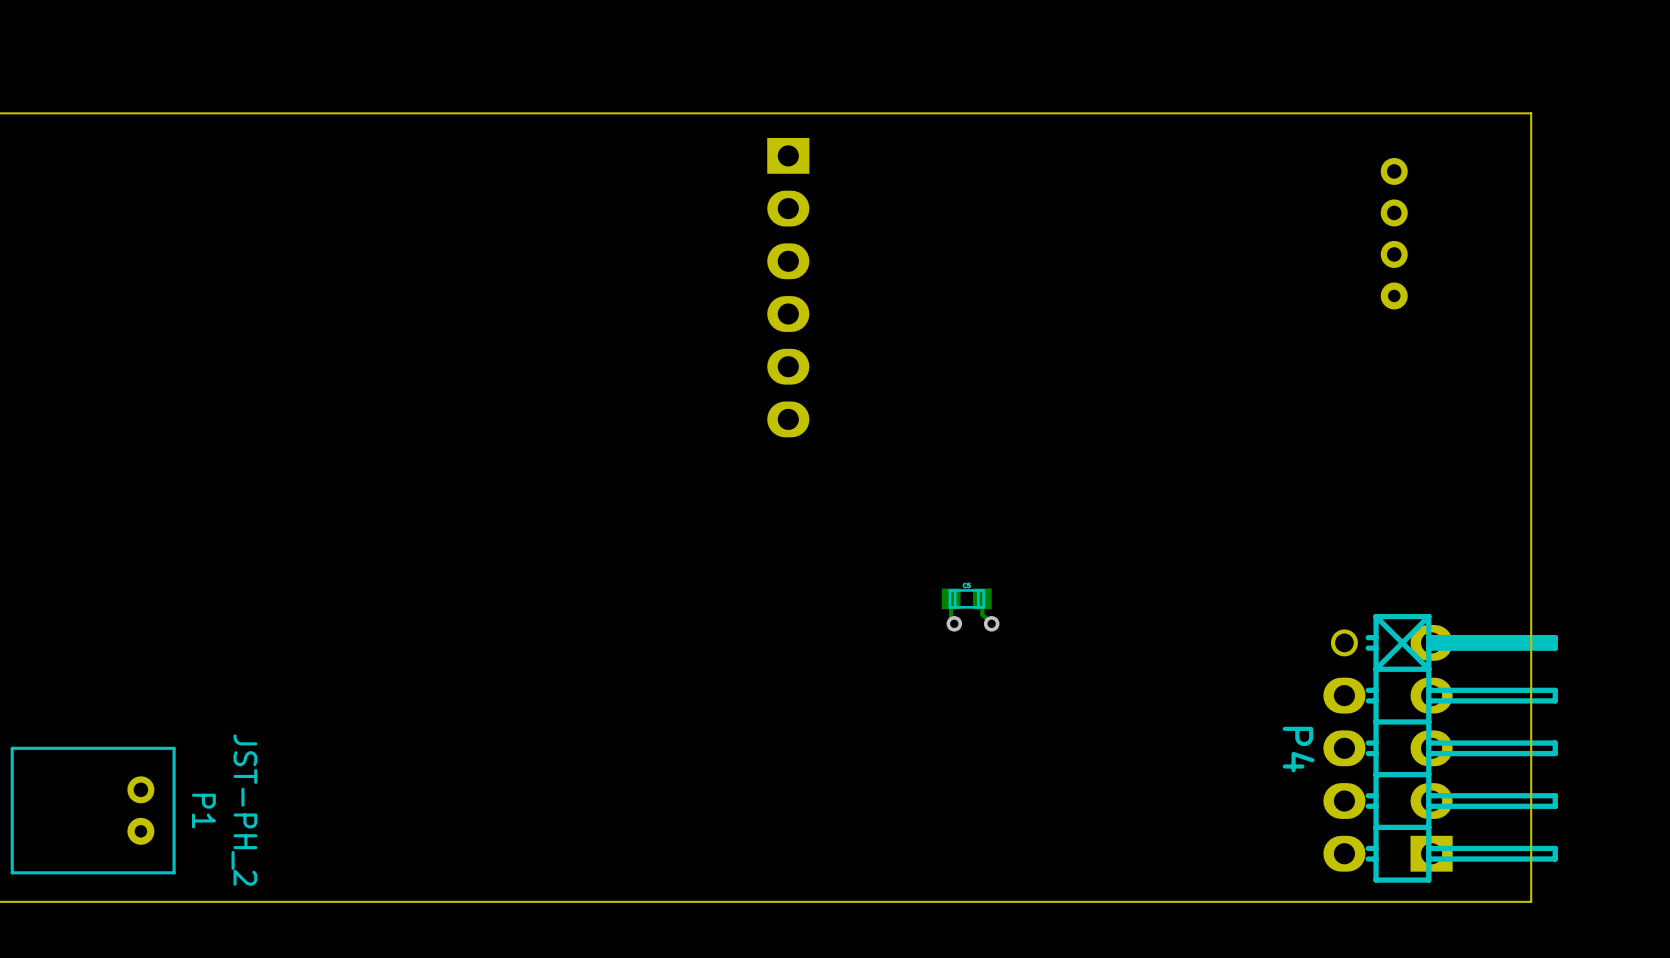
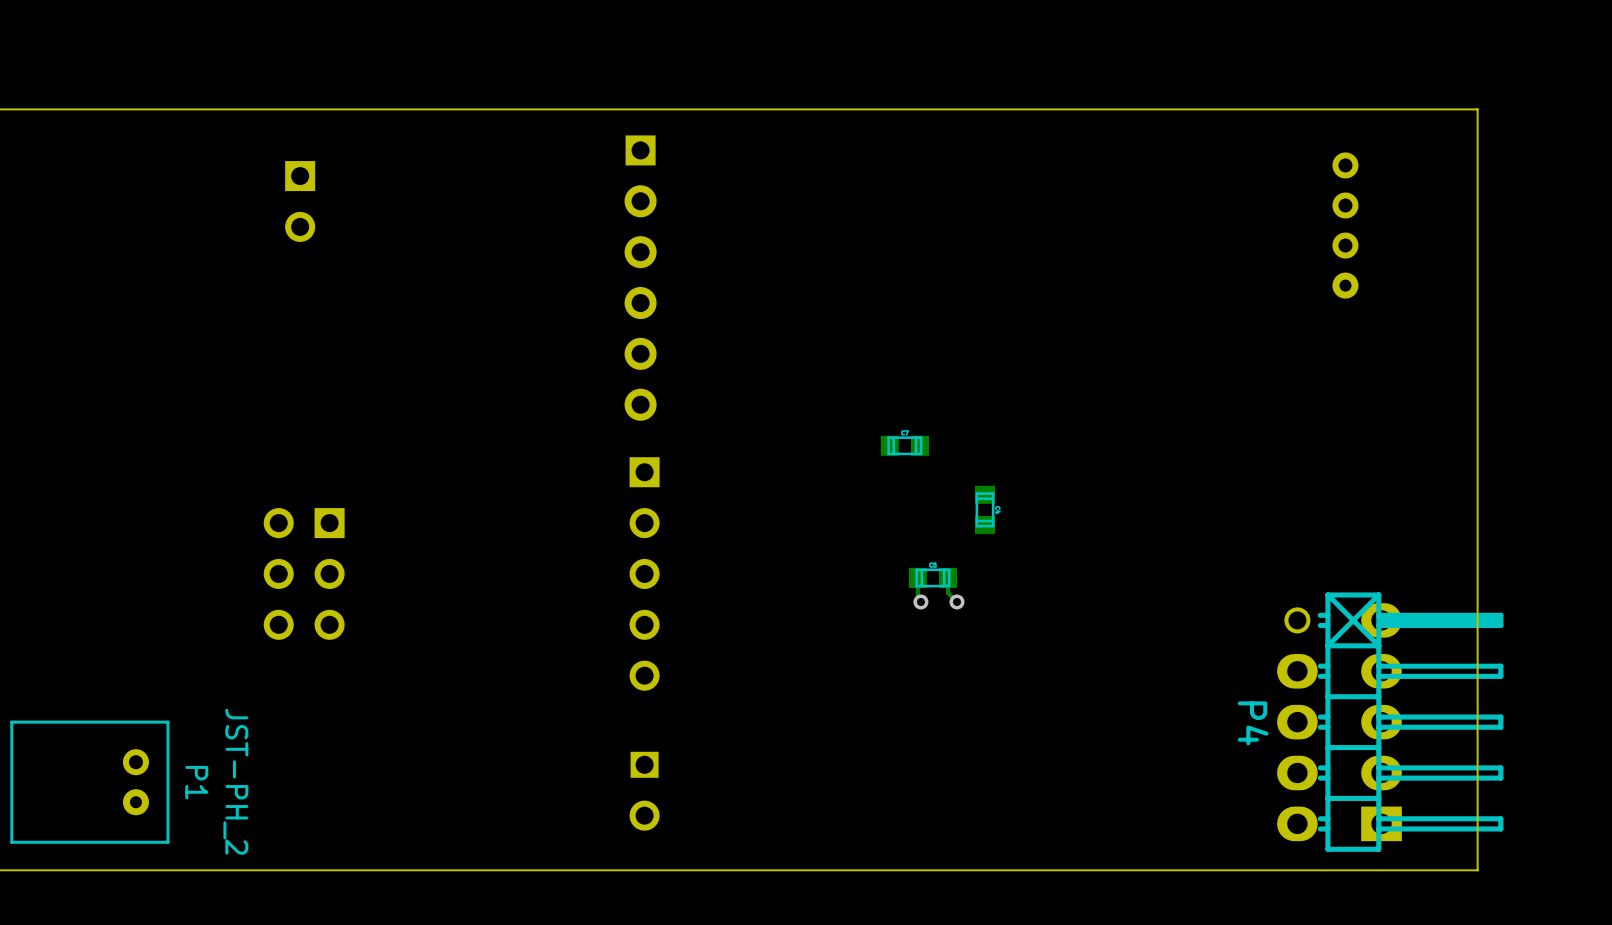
part: none -> (300, 201)
part: (788, 287) -> none
part: none -> (640, 278)
part: none -> (904, 445)
part: none -> (985, 509)
part: none -> (304, 573)
part: none -> (644, 573)
part: none -> (644, 791)

